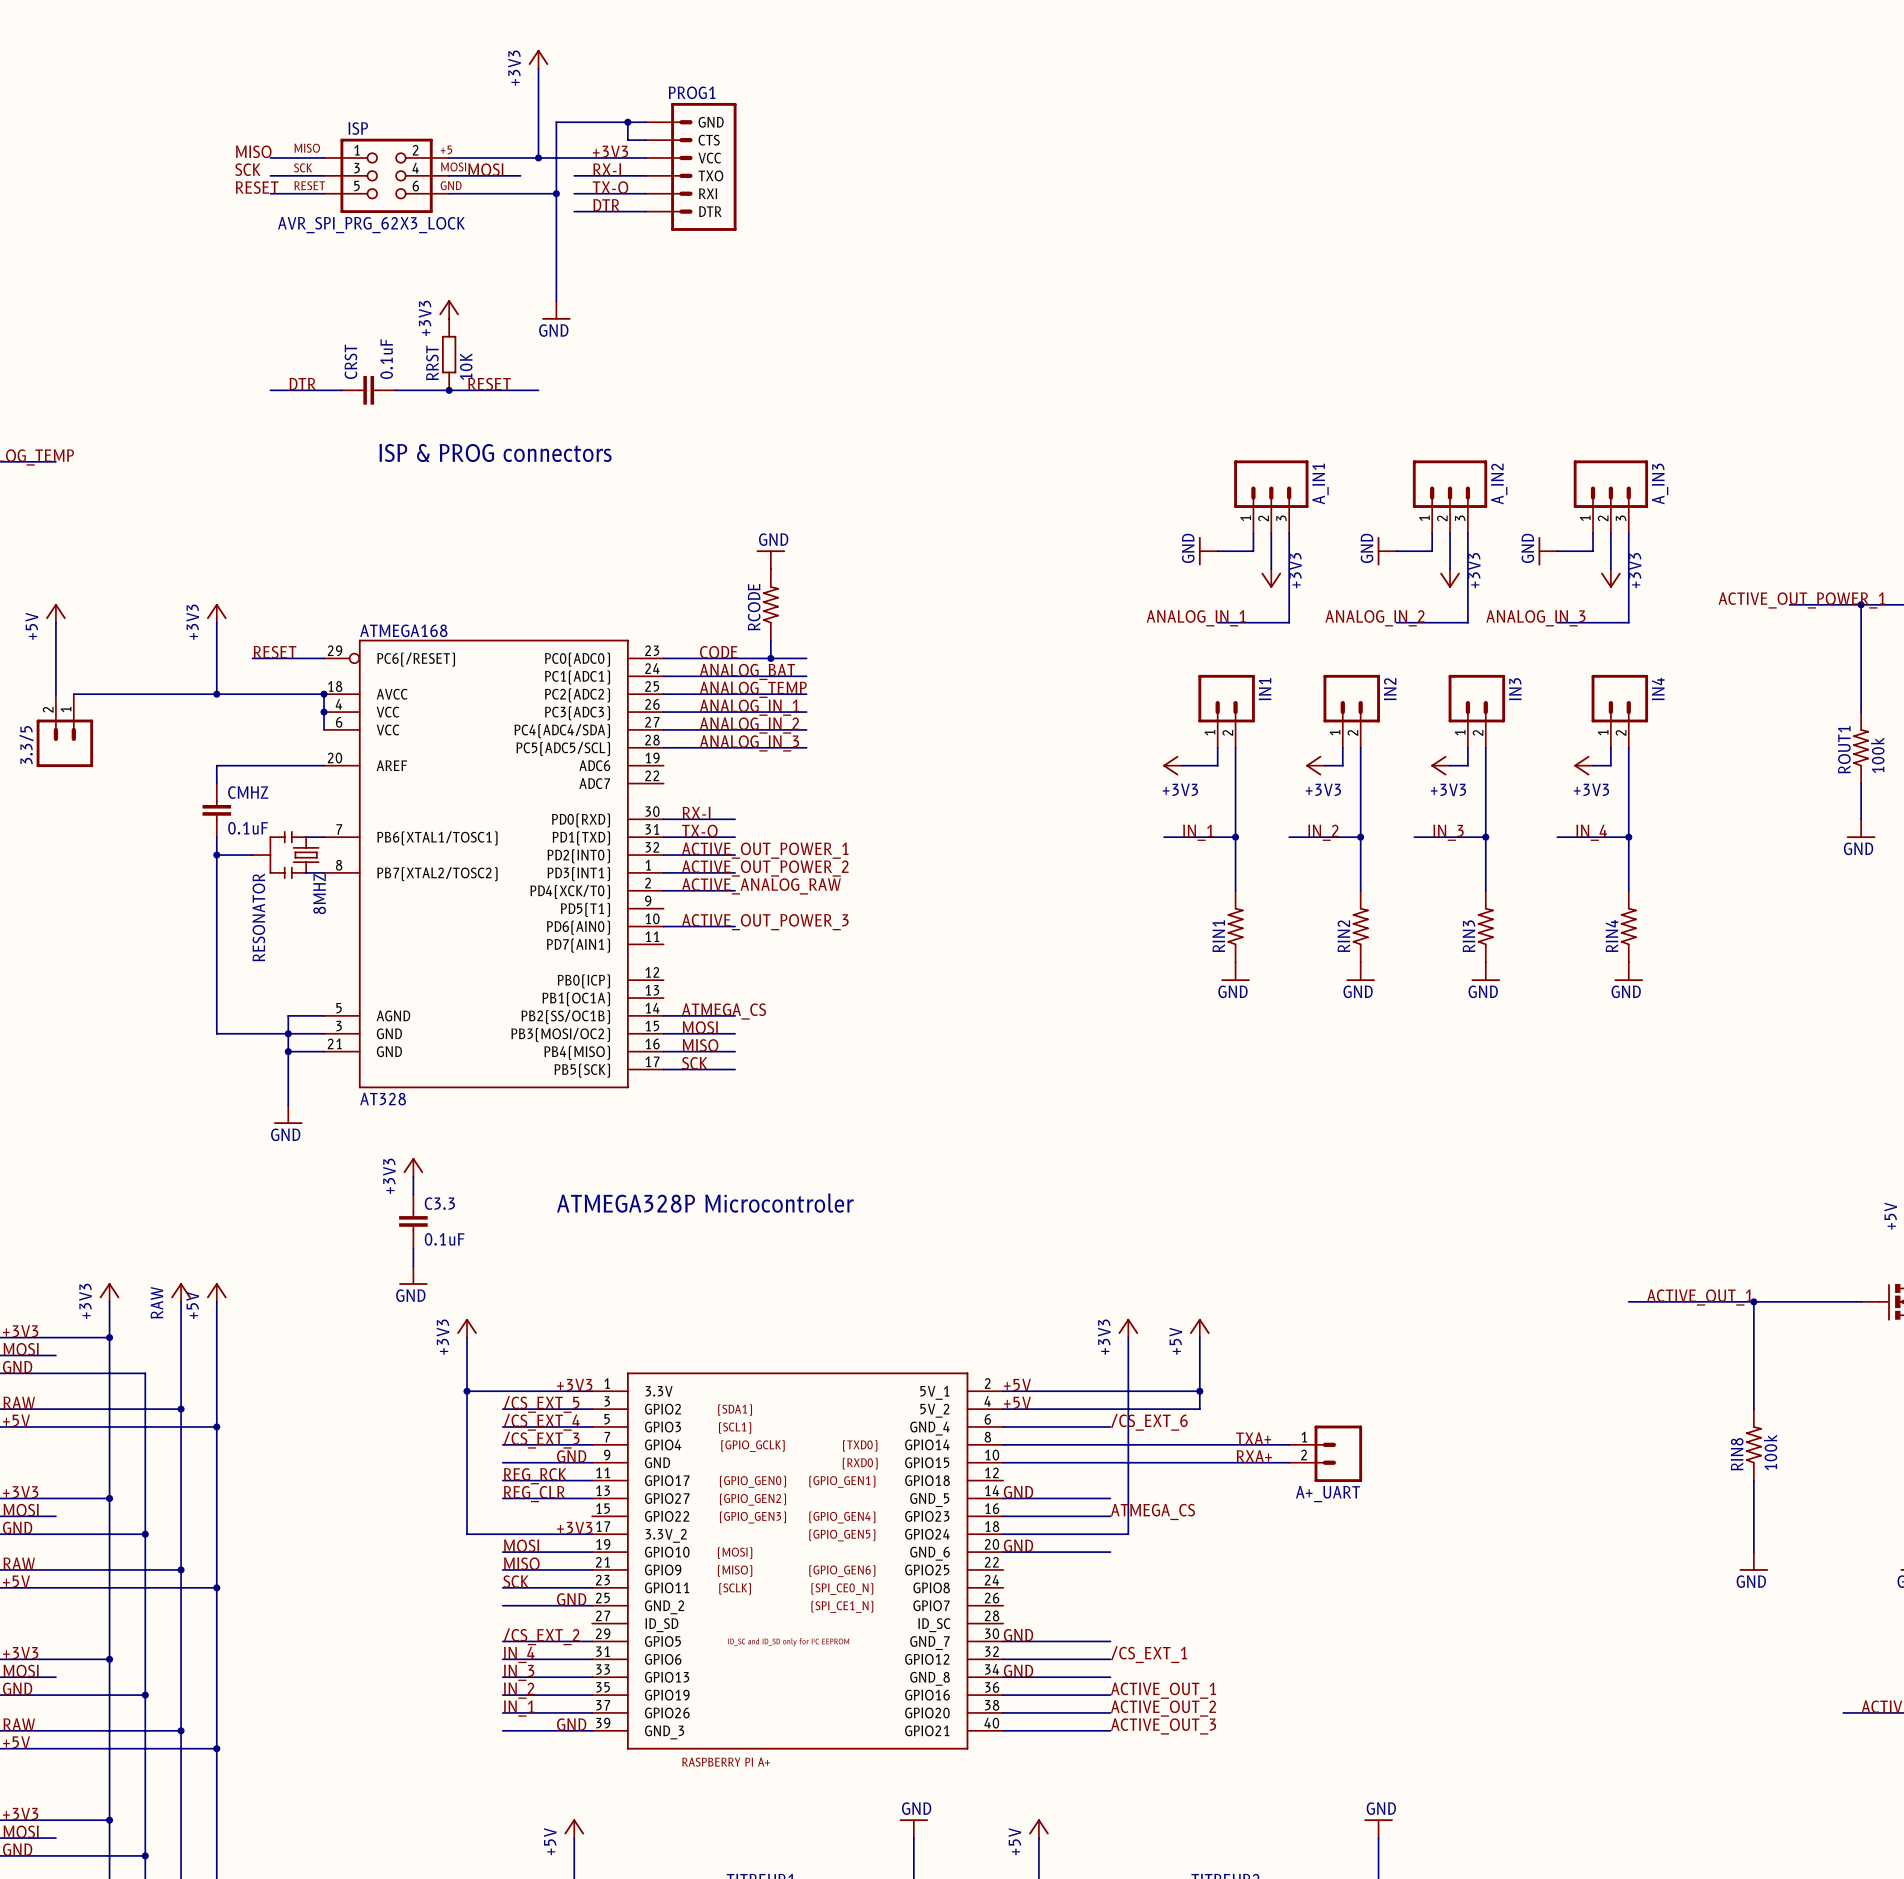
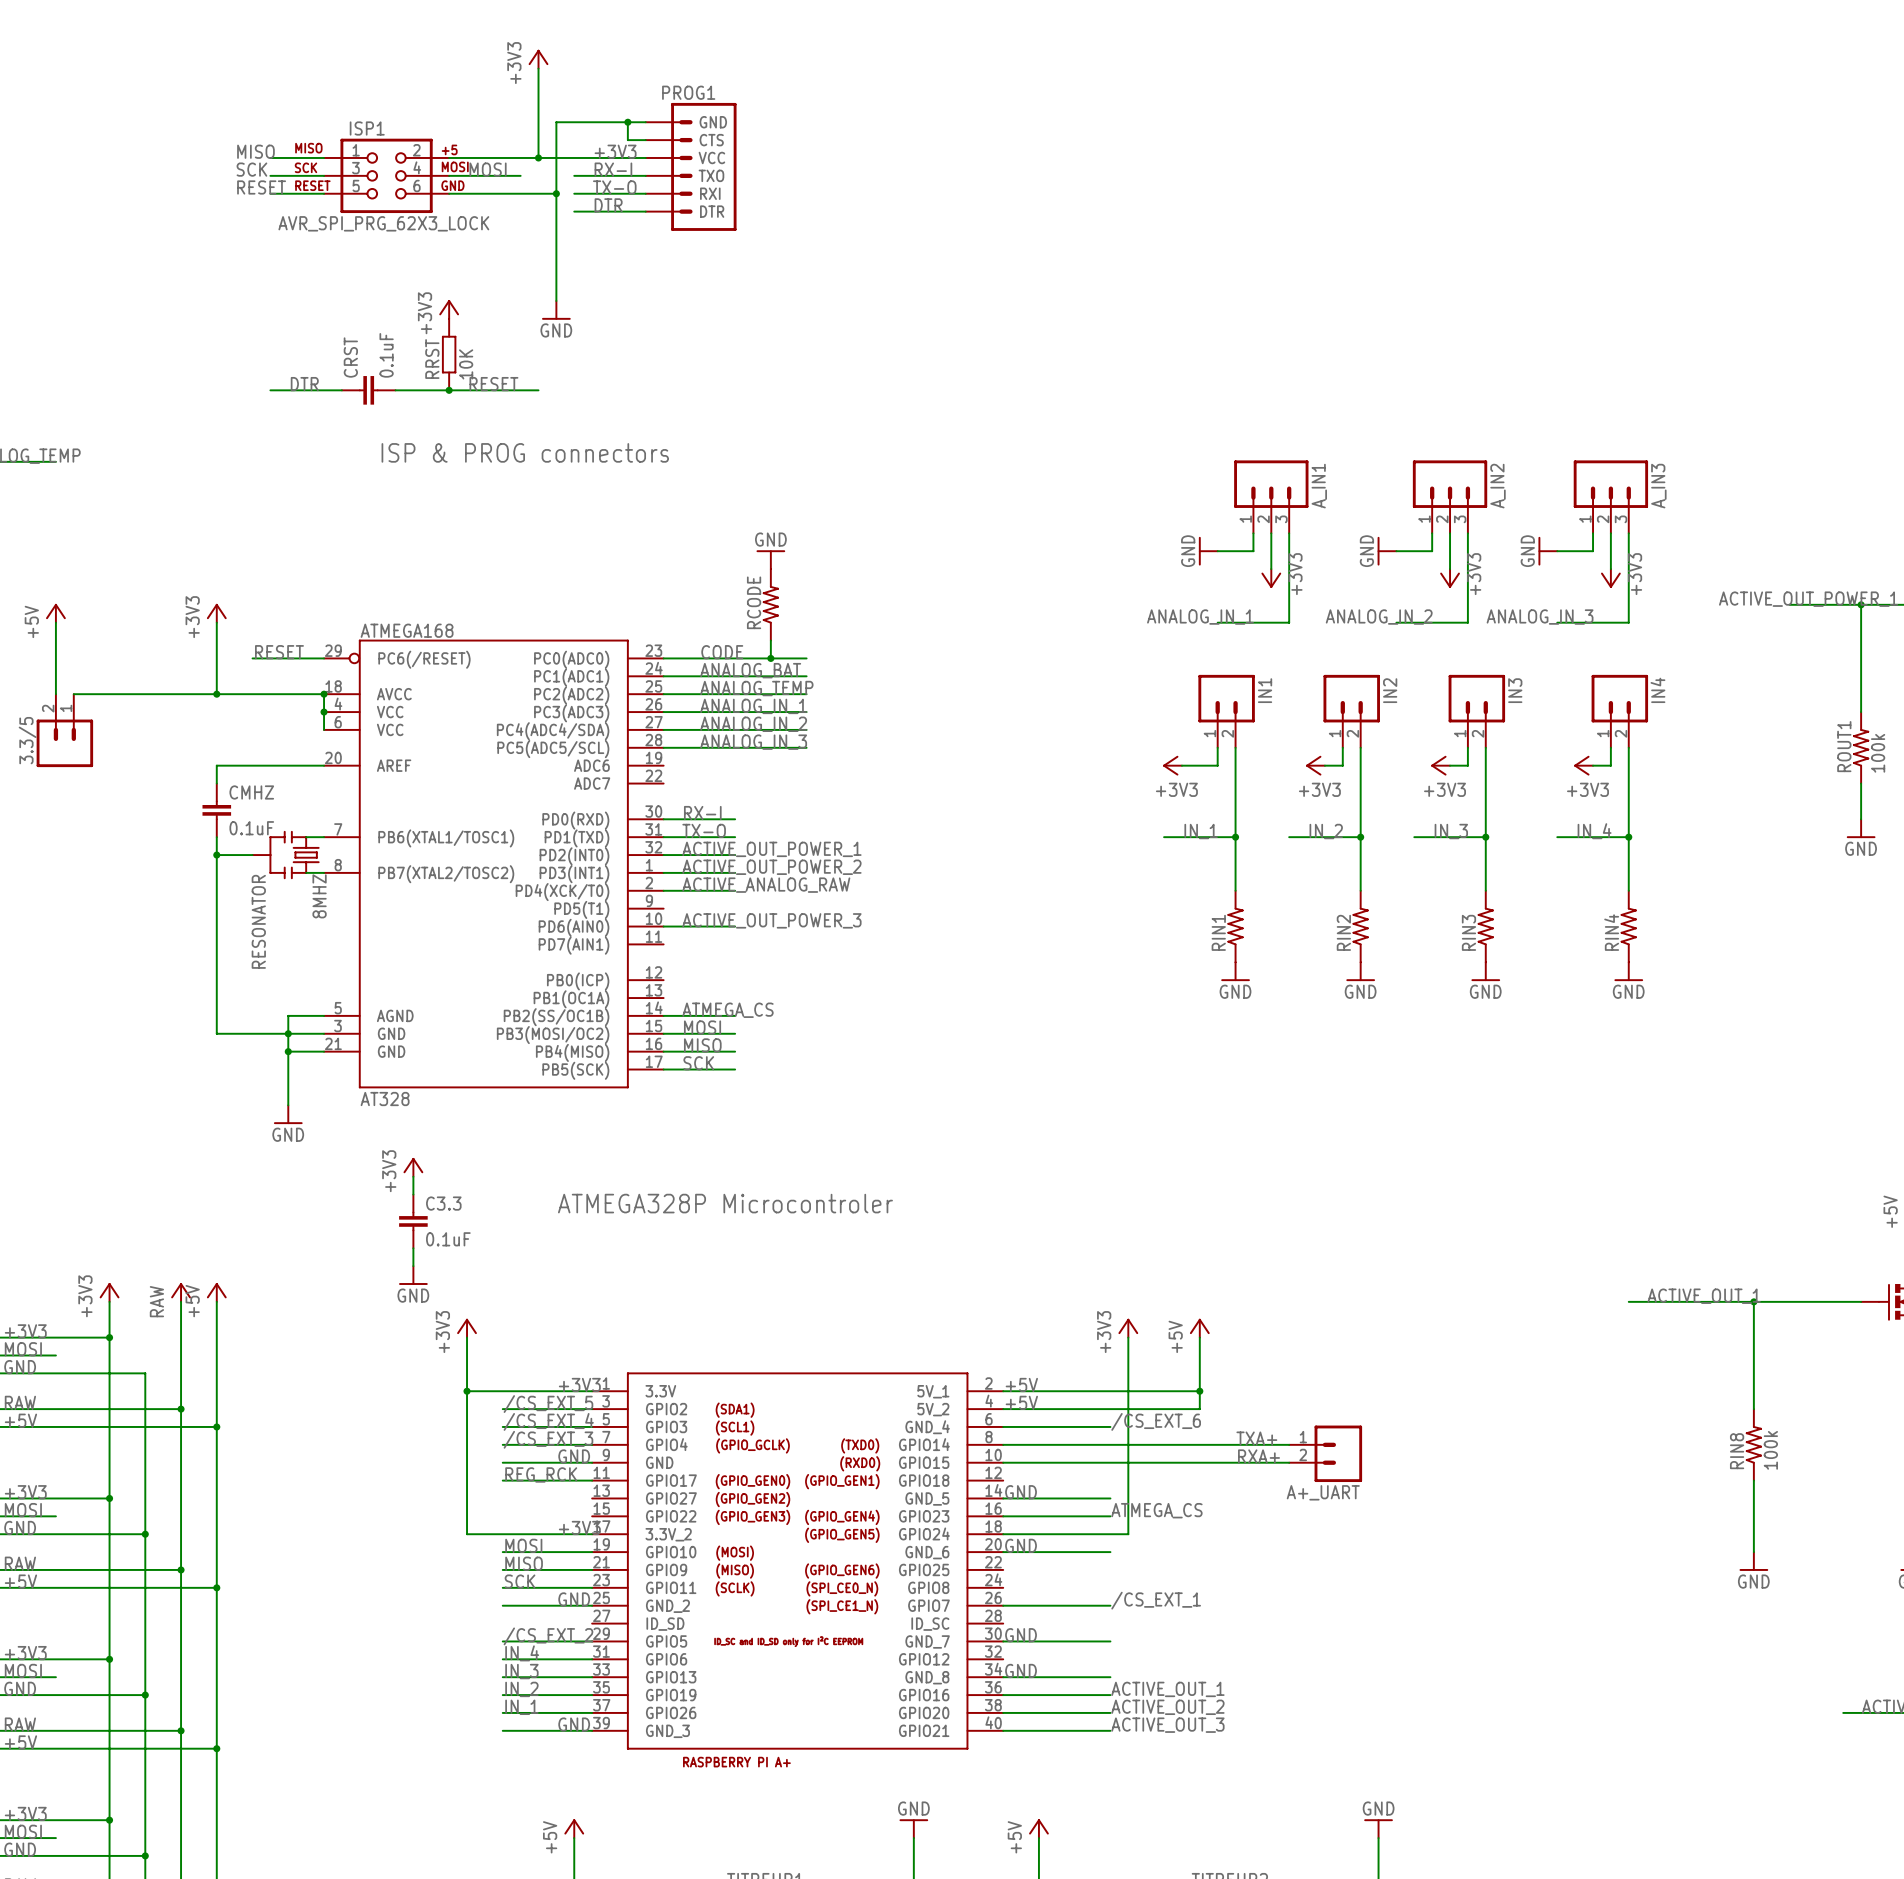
ISP name: ISP (358, 128) -> ISP1 (367, 128)
label: REG_CLR (534, 1494) -> none
wire: (502, 1498) (592, 1498) -> none
label position: /CS_EXT_1 (1149, 1654) -> /CS_EXT_1 (1156, 1600)
wire: (1003, 1659) (1110, 1659) -> (1003, 1605) (1110, 1605)

